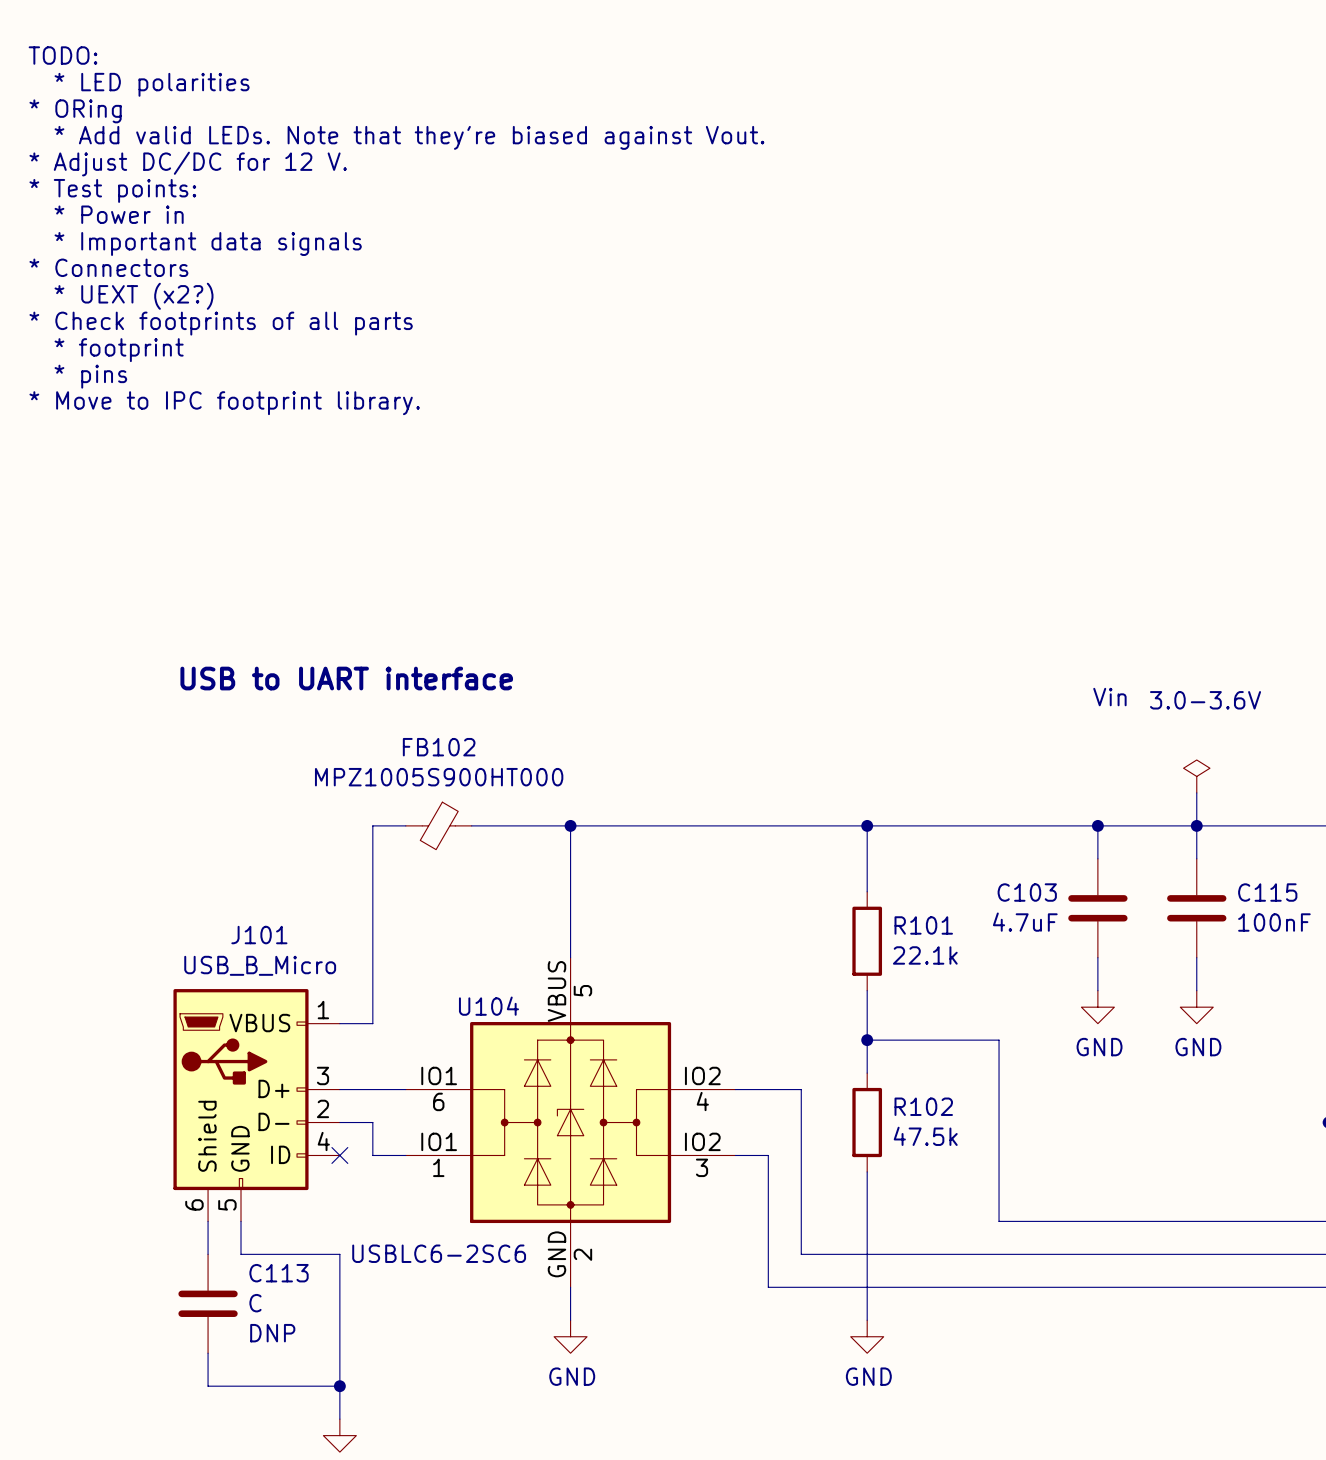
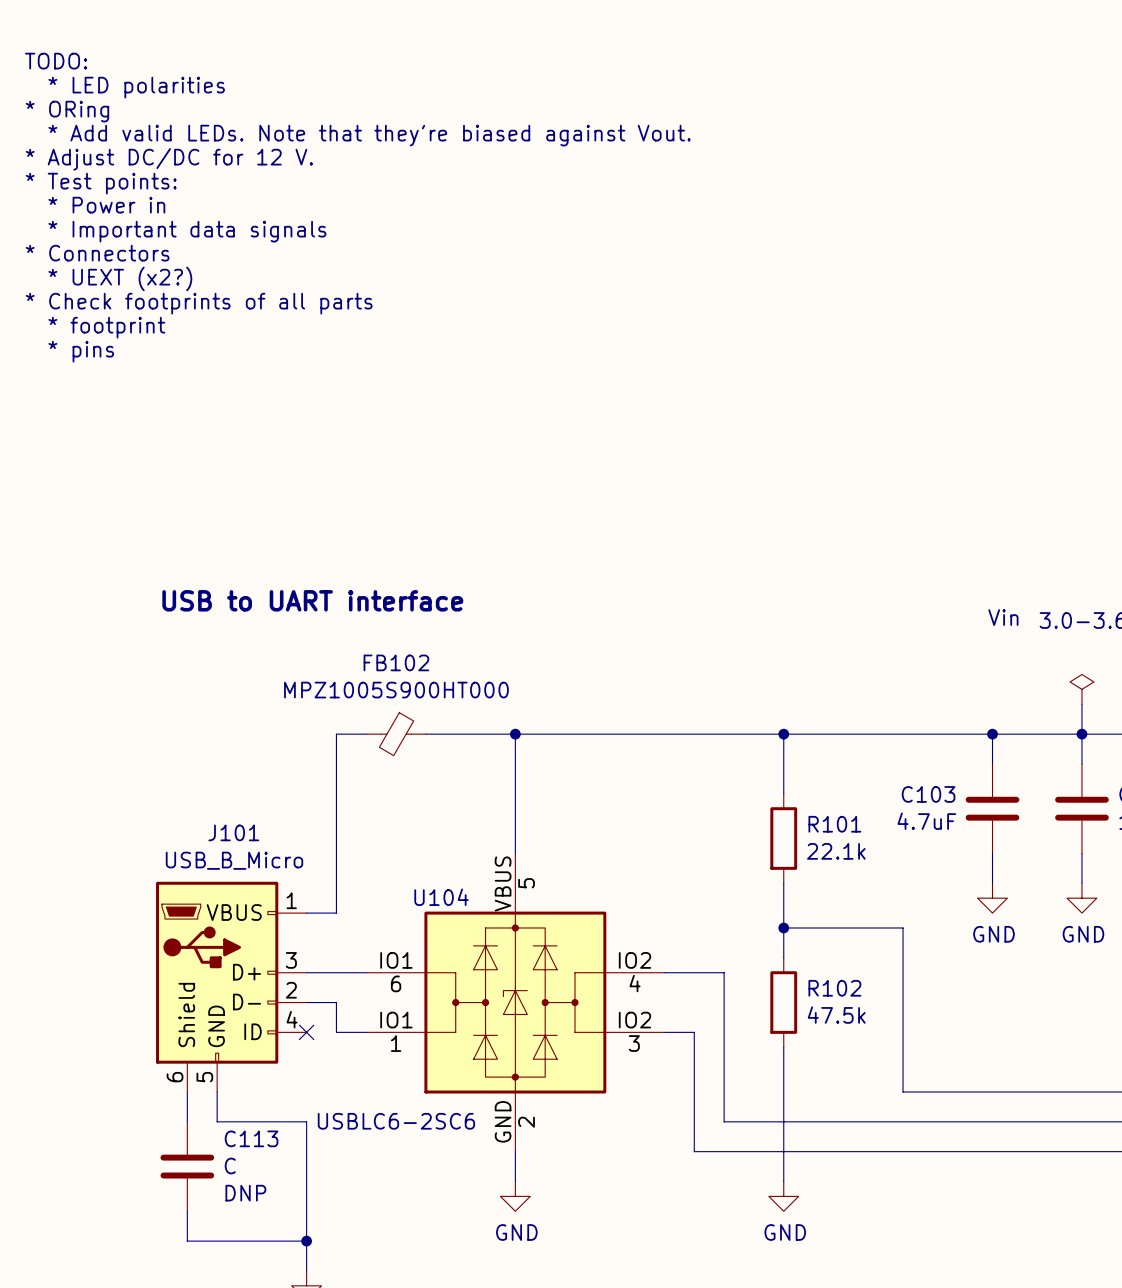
text: TODO: (63, 55) -> none
text: * LED polarities (152, 84) -> TODO: (56, 61)
text: * ORing (75, 111) -> * LED polarities (136, 87)
text: * Add valid LEDs. Note that they're biased against Vout. (409, 137) -> * ORing (67, 111)
text: * Adjust DC/DC for 12 V. (188, 164) -> * Add valid LEDs. Note that they're biased against Vout. (369, 135)
text: * Test points: (112, 190) -> * Adjust DC/DC for 12 V. (169, 159)
text: * Power in (119, 214) -> * Test points: (101, 183)
text: * Important data signals (208, 244) -> * Power in (106, 205)
text: * Connectors (108, 267) -> * Important data signals (187, 231)
text: * UEXT (x2?) (134, 296) -> * Connectors (97, 253)
text: * Check footprints of all parts (221, 323) -> * UEXT (x2?) (120, 278)
text: * footprint (119, 350) -> * Check footprints of all parts (199, 303)
text: * pins (90, 376) -> * footprint (106, 327)
text: * Move to IPC footprint library. (224, 403) -> * pins (81, 351)

